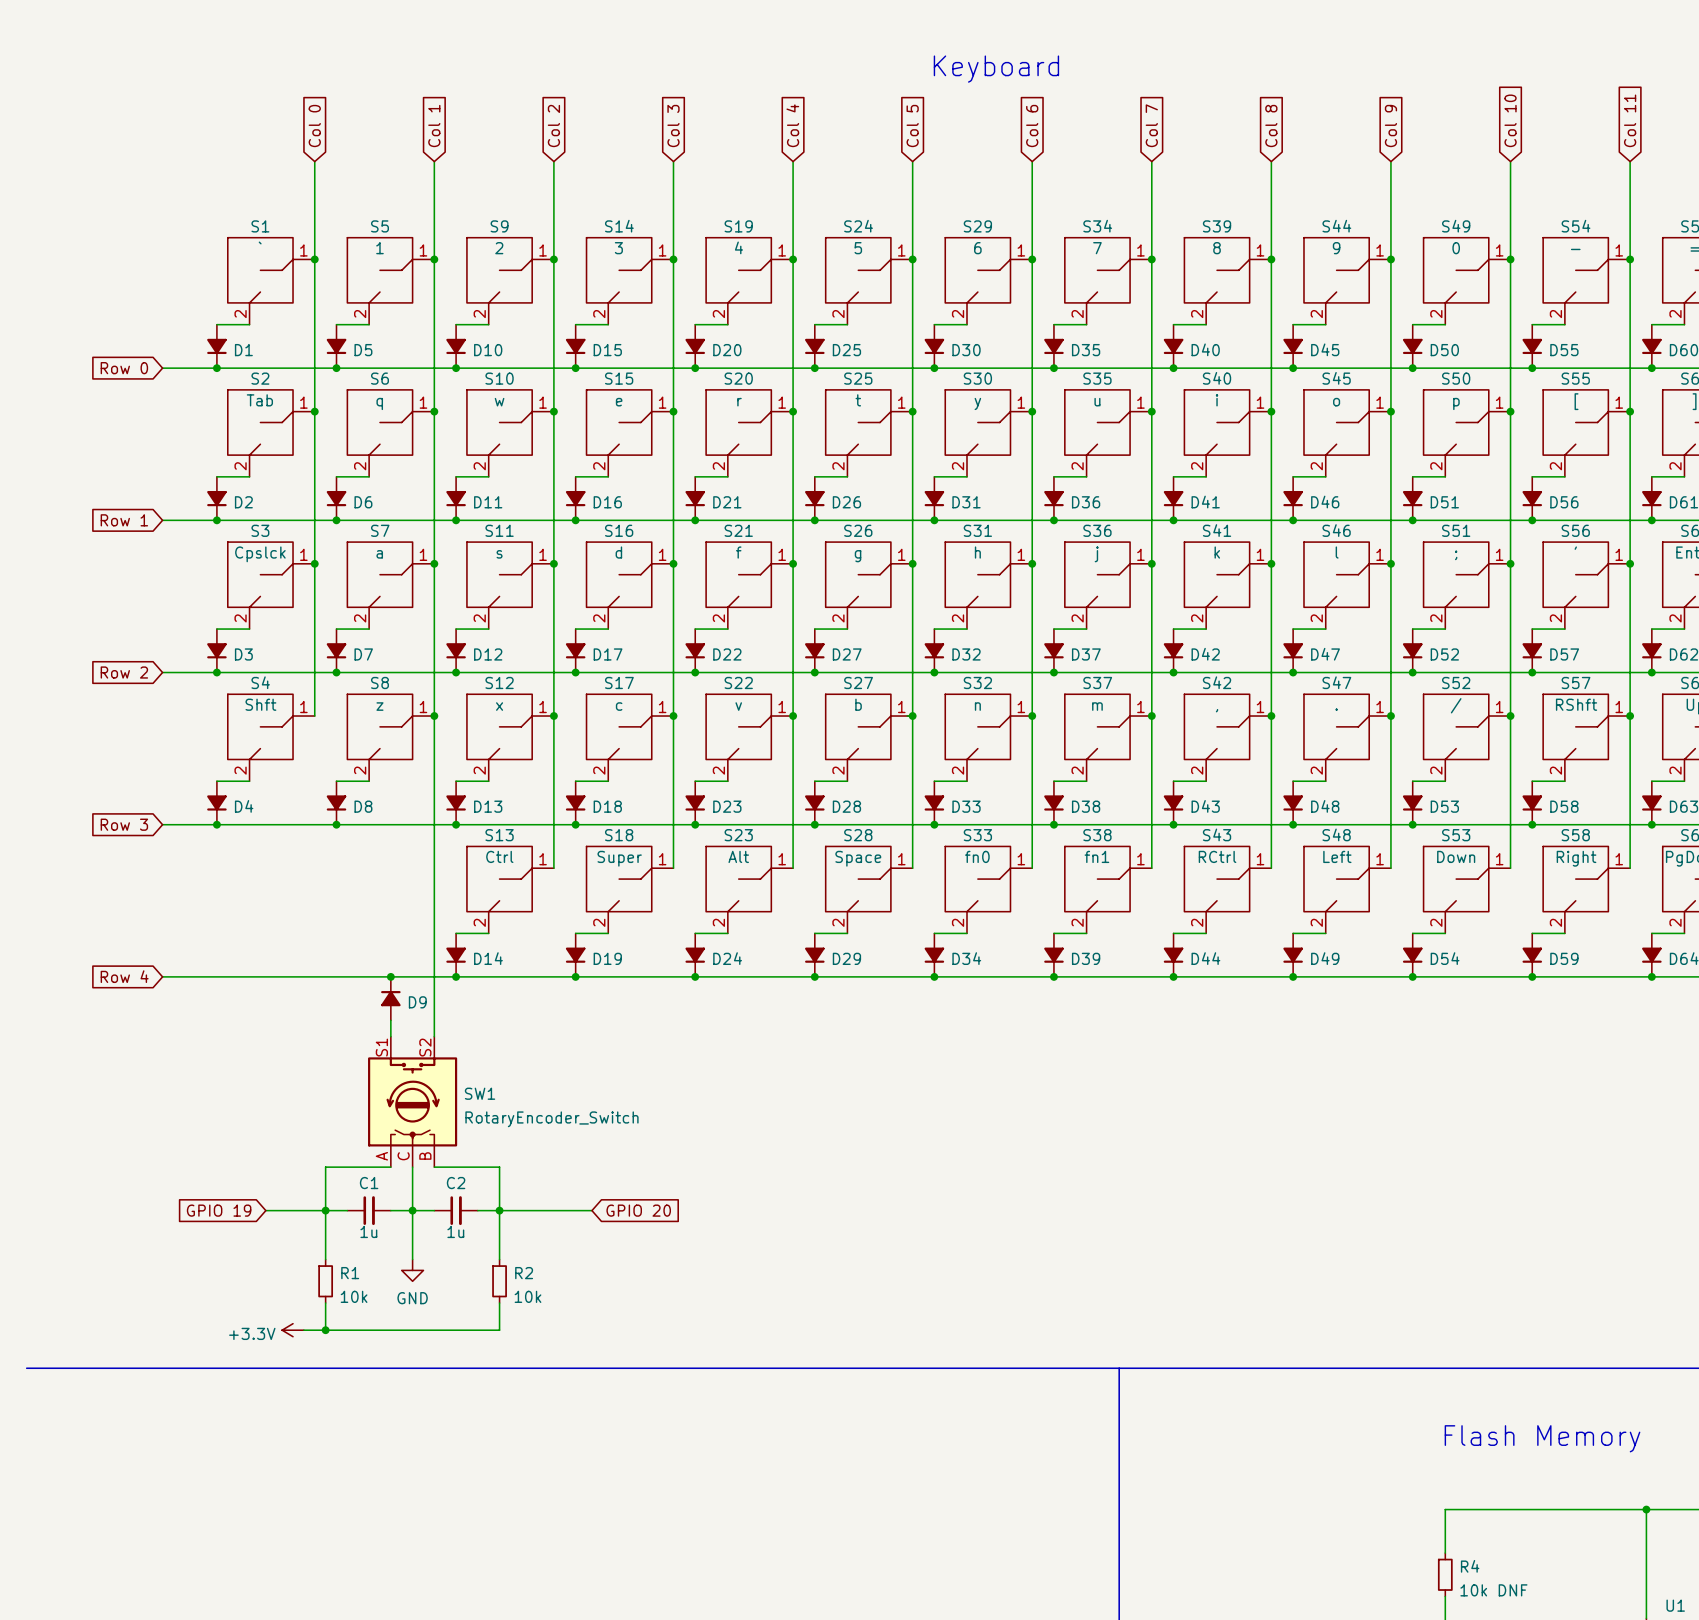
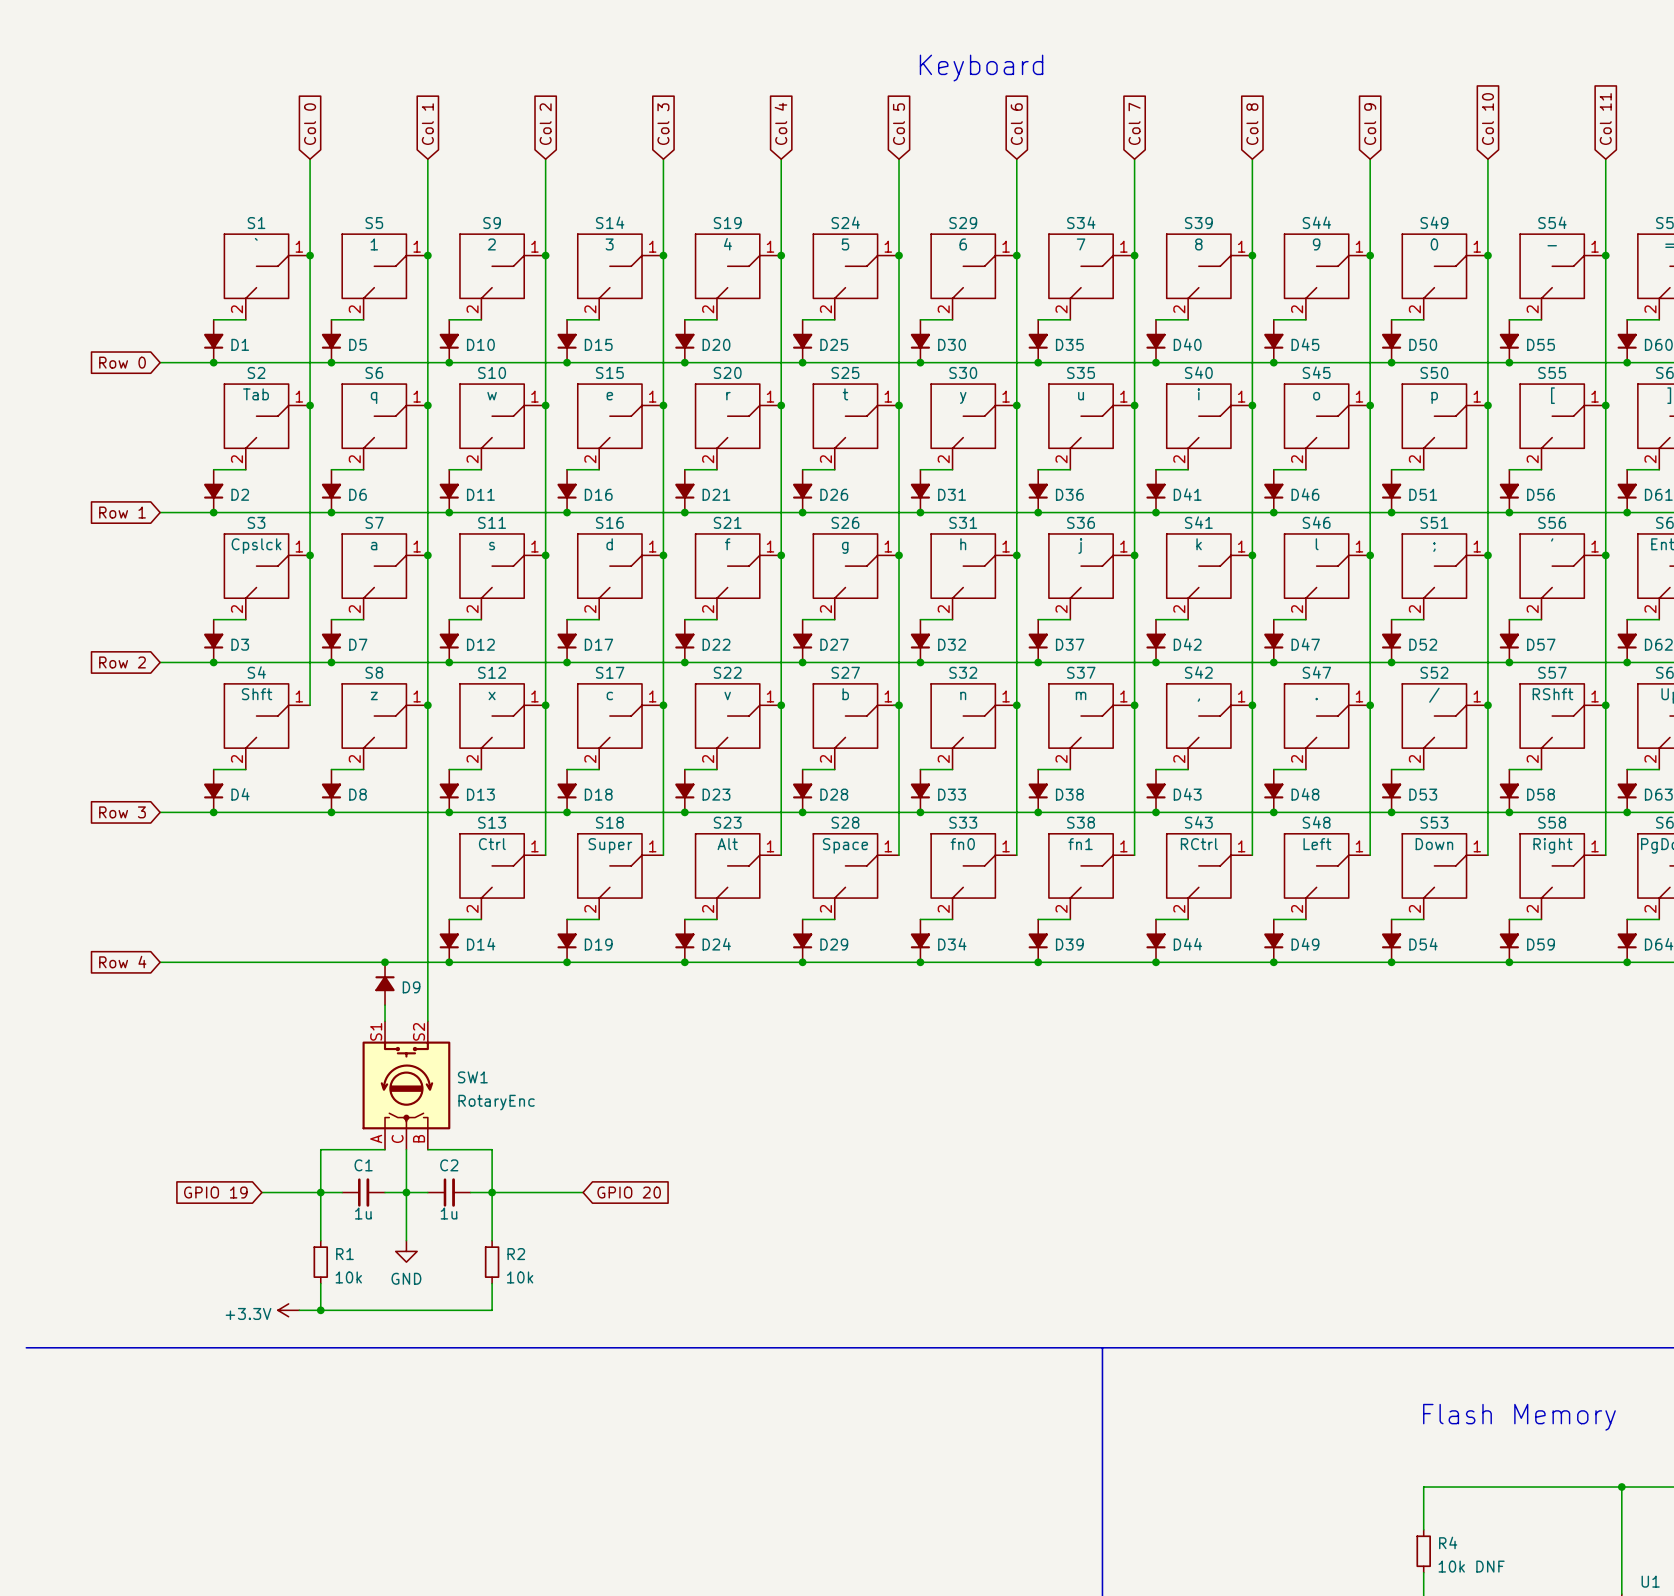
SW1 value: RotaryEncoder_Switch (551, 1119) -> RotaryEnc (496, 1102)

